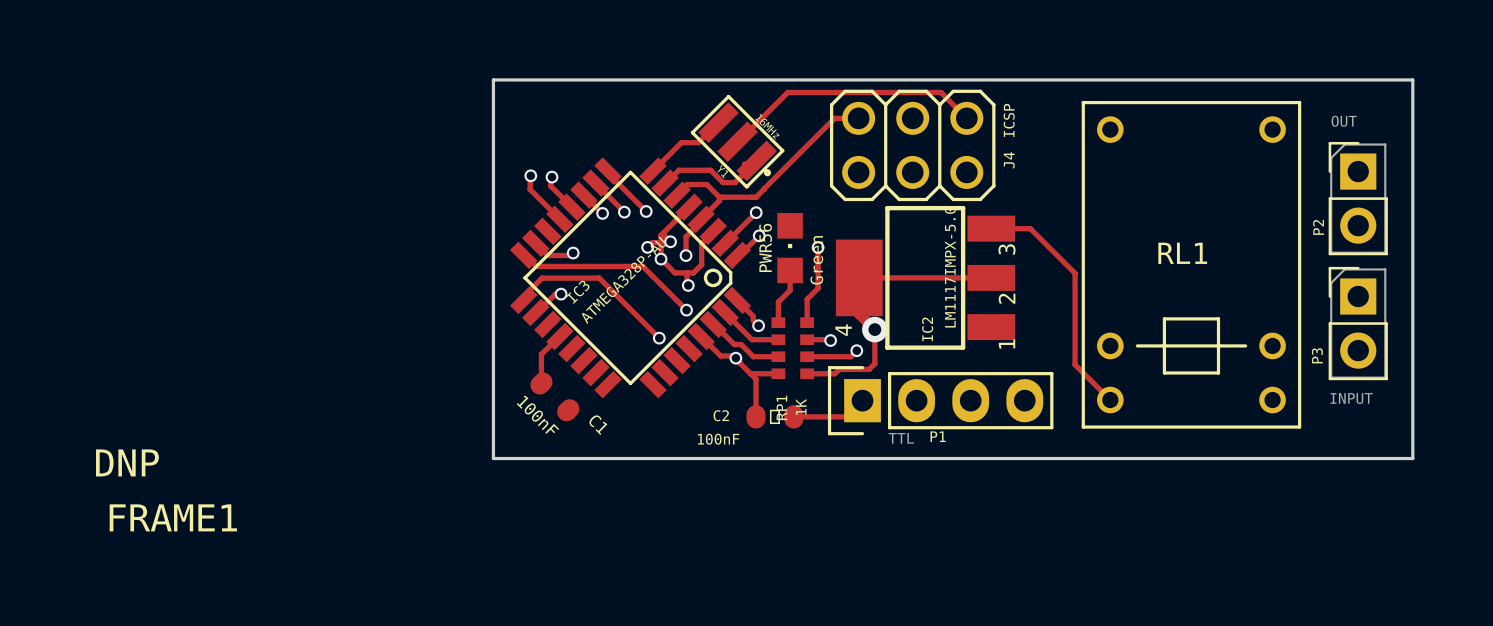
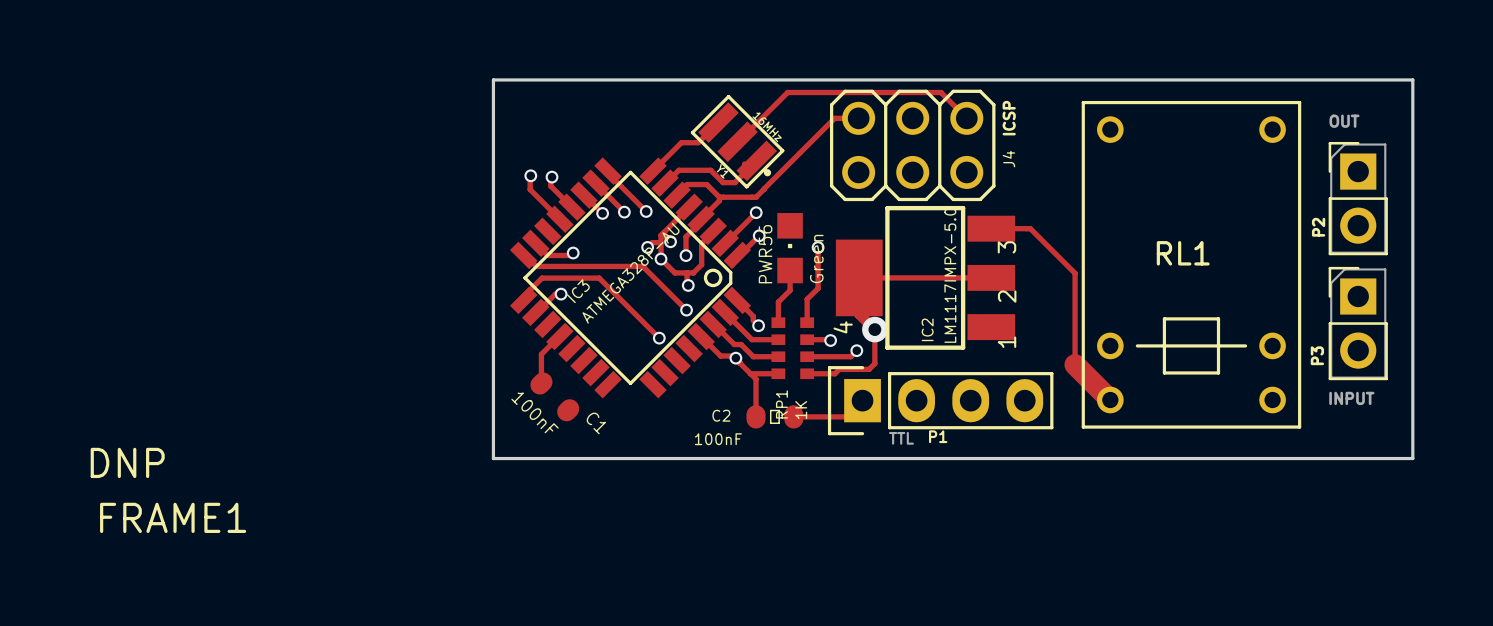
track width: thin (1075, 364) (1110, 400) -> thick (1075, 364) (1110, 400)

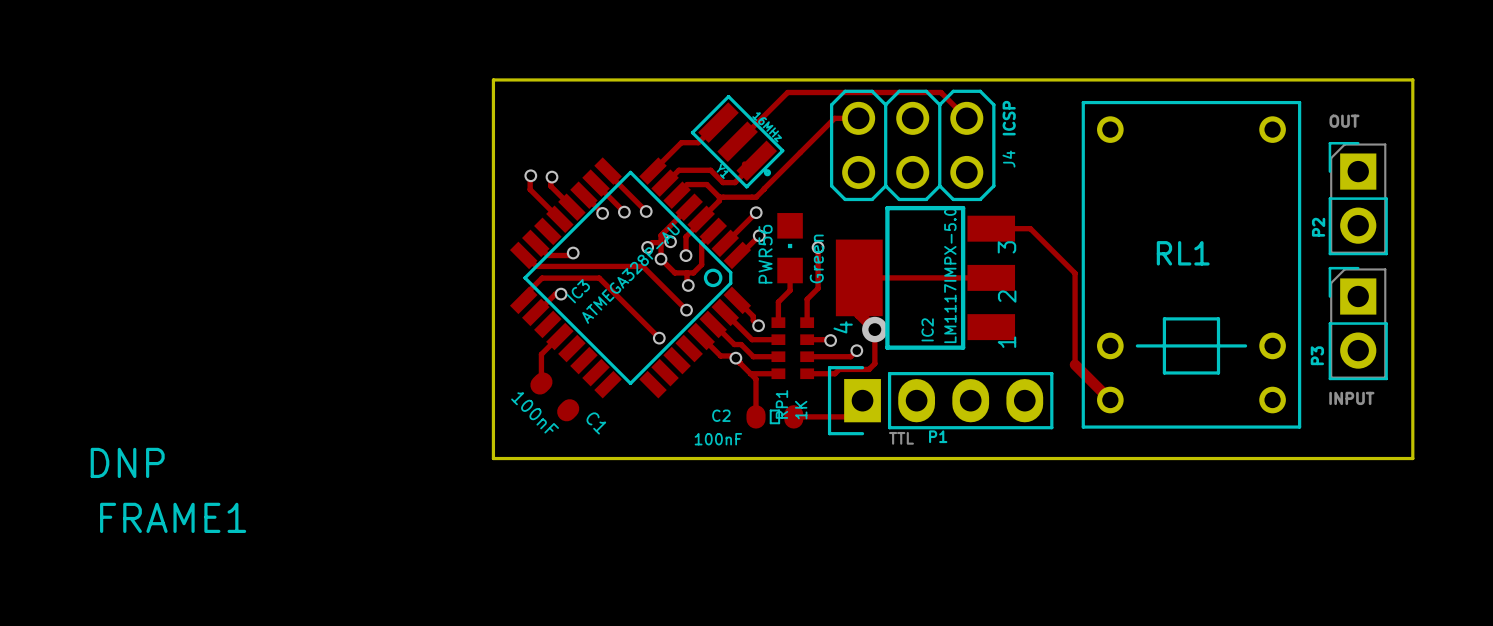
track width: thick (1075, 364) (1110, 400) -> thin (1075, 364) (1110, 400)

